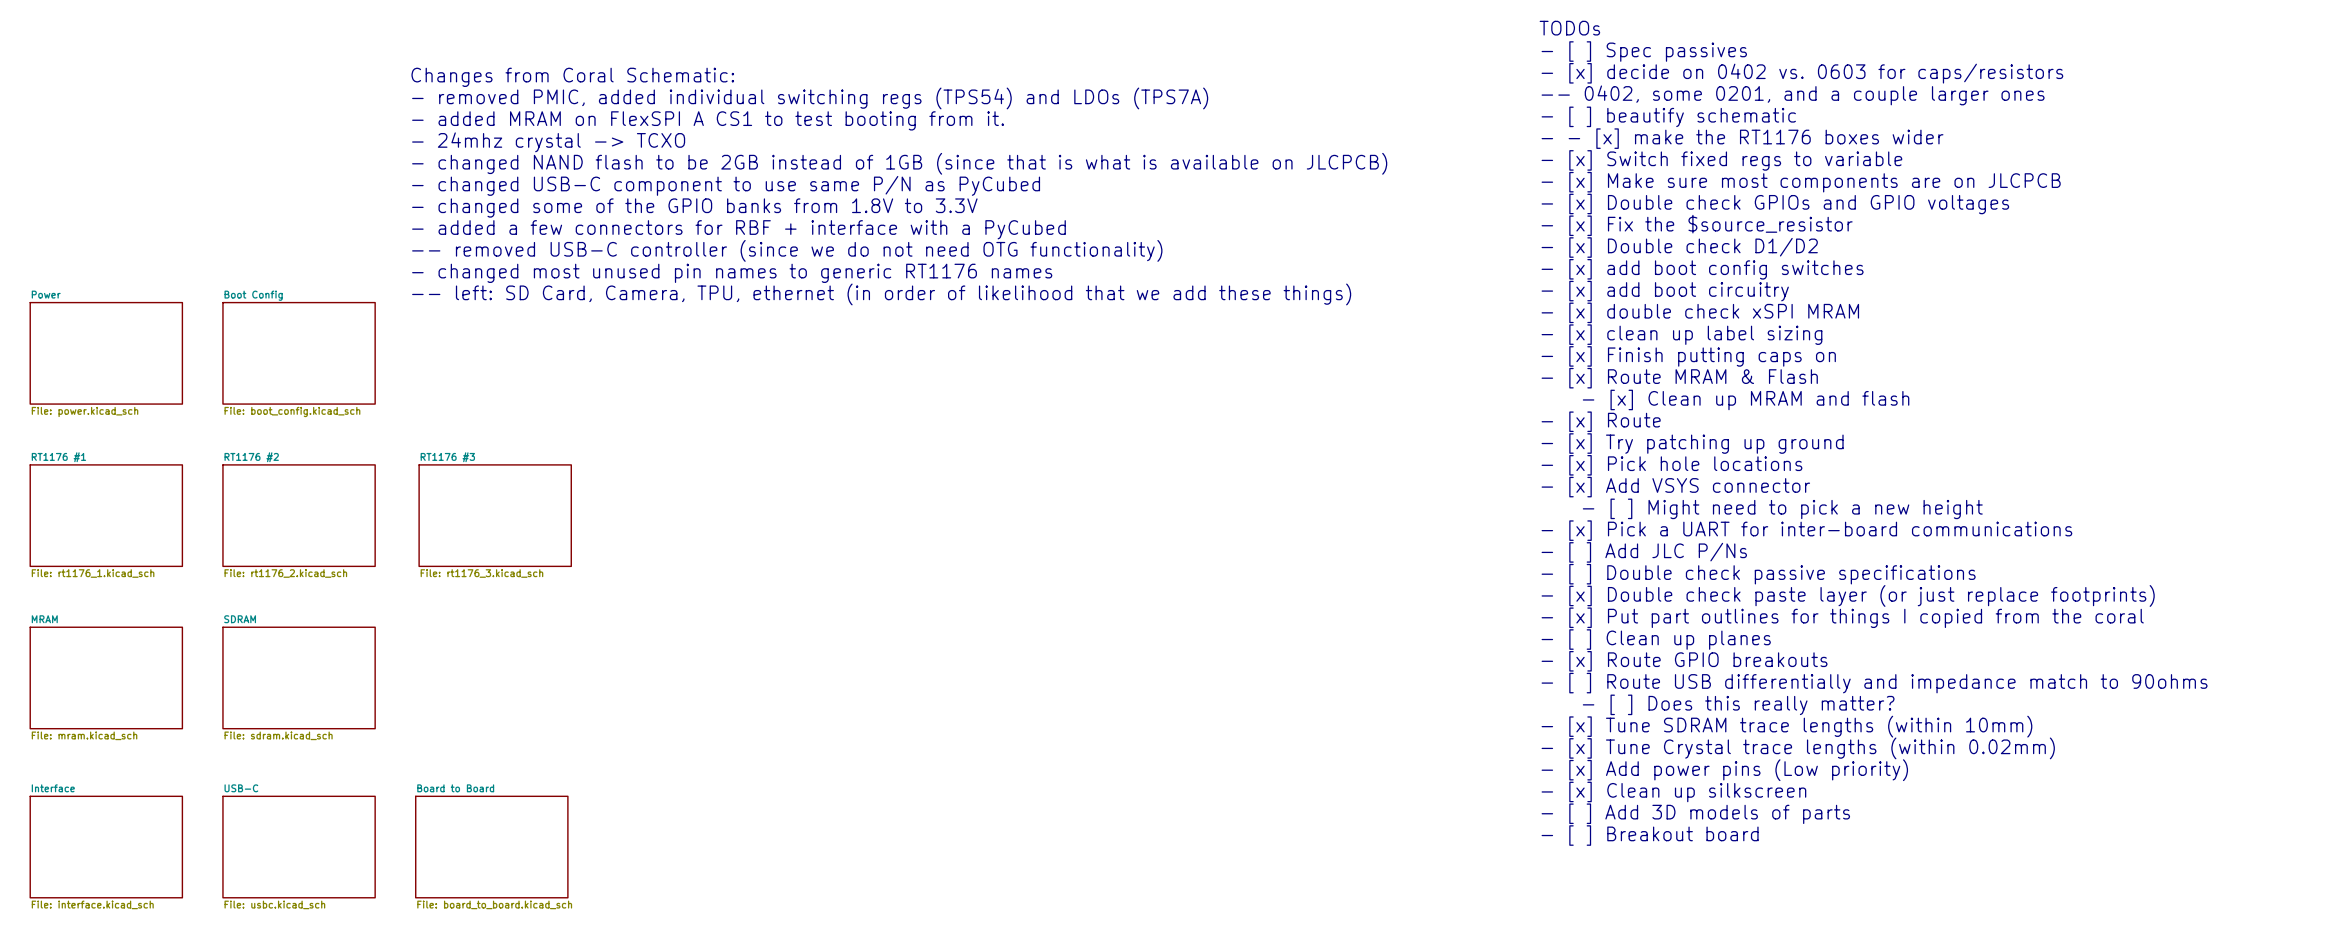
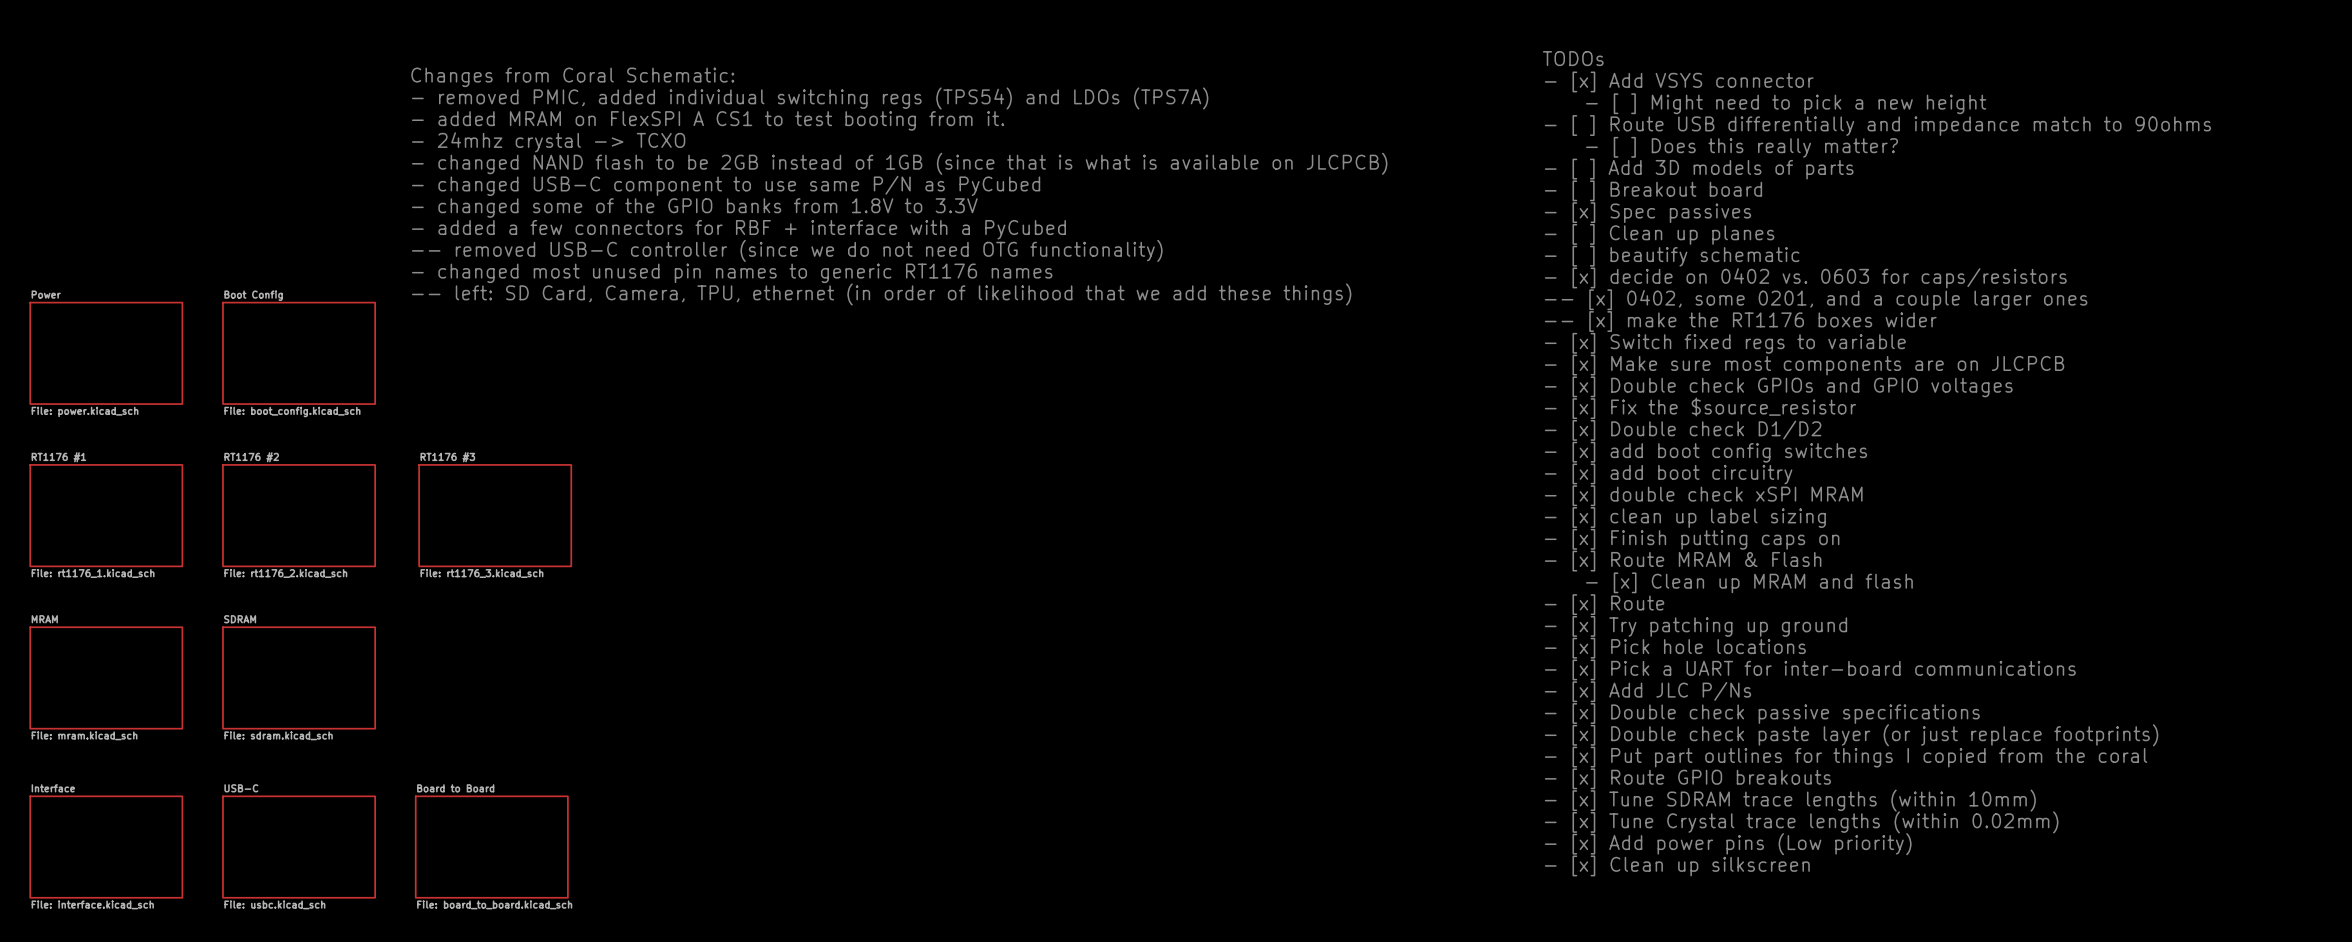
text position: TODOs (1569, 28) -> TODOs (1573, 58)
text: - [ ] Spec passives (1644, 51) -> none
text: - [x] decide on 0402 vs. 0603 for caps/resistors (1802, 73) -> none
text: none -> - [x] Add VSYS connector (1679, 81)
text: -- 0402, some 0201, and a couple larger ones (1793, 95) -> none
text: none -> - [ ] Might need to pick a new height (1786, 103)
text: - [ ] beautify schematic (1668, 116) -> none
text: none -> - [ ] Route USB differentially and impedance match to 90ohms (1877, 125)
text: - - [x] make the RT1176 boxes wider (1742, 138) -> none
text: none -> - [ ] Does this really matter? (1742, 147)
text: - [x] Switch fixed regs to variable (1721, 160) -> none
text: none -> - [ ] Add 3D models of parts (1699, 169)
text: - [x] Make sure most components are on JLCPCB (1801, 182) -> none
text: none -> - [ ] Breakout board (1653, 190)
text: - [x] Double check GPIOs and GPIO voltages (1775, 203) -> none
text: none -> - [x] Spec passives (1647, 212)
text: - [x] Fix the $source_resistor (1697, 225) -> none
text: none -> - [ ] Clean up planes (1659, 234)
text: - [x] Double check D1/D2 (1679, 247) -> none
text: none -> - [ ] beautify schematic (1672, 256)
text: - [x] add boot config switches (1702, 269) -> none
text: none -> - [x] decide on 0402 vs. 0603 for caps/resistors (1805, 277)
text: - [x] add boot circuitry (1665, 291) -> none
text: none -> -- [x] 0402, some 0201, and a couple larger ones (1816, 299)
text: - [x] double check xSPI MRAM (1700, 312) -> none
text: none -> -- [x] make the RT1176 boxes wider (1740, 321)
text: - [x] clean up label sizing (1681, 334) -> none
text: none -> - [x] Switch fixed regs to variable (1725, 343)
text: - [x] Finish putting caps on (1688, 356) -> none
text: none -> - [x] Make sure most components are on JLCPCB (1804, 365)
text: - [x] Route MRAM & Flash (1679, 378) -> none
text: none -> - [x] Double check GPIOs and GPIO voltages (1778, 386)
text: - [x] Clean up MRAM and flash (1746, 399) -> none
text: none -> - [x] Fix the $source_resistor (1700, 408)
text: - [x] Route (1601, 421) -> none
text: none -> - [x] Double check D1/D2 (1683, 430)
text: - [x] Try patching up ground (1692, 443) -> none
text: none -> - [x] add boot config switches (1705, 452)
text: - [x] Pick hole locations (1671, 465) -> none
text: none -> - [x] add boot circuitry (1668, 473)
text: - [x] Add VSYS connector (1675, 487) -> none
text: none -> - [x] double check xSPI MRAM (1703, 495)
text: - [ ] Might need to pick a new height (1782, 508) -> none
text: none -> - [x] clean up label sizing (1685, 517)
text: - [x] Pick a UART for inter-board communications (1806, 530) -> none
text: none -> - [x] Finish putting caps on (1692, 539)
text: - [ ] Add JLC P/Ns (1644, 552) -> none
text: none -> - [x] Route MRAM & Flash (1683, 561)
text: - [ ] Double check passive specifications (1758, 574) -> none
text: none -> - [x] Clean up MRAM and flash (1749, 582)
text: - [x] Double check paste layer (or just replace footprints) (1848, 595) -> none
text: none -> - [x] Route (1604, 604)
text: - [x] Put part outlines for things I copied from the coral (1842, 617) -> none
text: none -> - [x] Try patching up ground (1695, 626)
text: - [ ] Clean up planes (1656, 639) -> none
text: none -> - [x] Pick hole locations (1675, 648)
text position: - [x] Route GPIO breakouts (1684, 661) -> - [x] Route GPIO breakouts (1687, 778)
text: none -> - [x] Pick a UART for inter-board communications (1810, 669)
text: - [ ] Route USB differentially and impedance match to 90ohms (1874, 683) -> none
text: none -> - [x] Add JLC P/Ns (1647, 691)
text: - [ ] Does this really matter? (1738, 704) -> none
text: none -> - [x] Double check passive specifications (1762, 713)
text position: - [x] Tune SDRAM trace lengths (within 10mm) (1786, 726) -> - [x] Tune SDRAM trace lengths (within 10mm) (1790, 800)
text: none -> - [x] Double check paste layer (or just replace footprints) (1851, 735)
text position: - [x] Tune Crystal trace lengths (within 0.02mm) (1798, 748) -> - [x] Tune Crystal trace lengths (within 0.02mm) (1801, 822)
text: none -> - [x] Put part outlines for things I copied from the coral (1846, 757)
text position: - [x] Add power pins (Low priority) (1724, 770) -> - [x] Add power pins (Low priority) (1728, 844)
text position: - [x] Clean up silkscreen (1673, 791) -> - [x] Clean up silkscreen (1677, 865)
text: - [ ] Add 3D models of parts (1695, 813) -> none
text: - [ ] Breakout board (1650, 835) -> none

